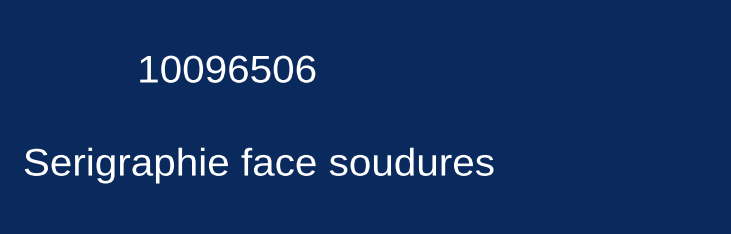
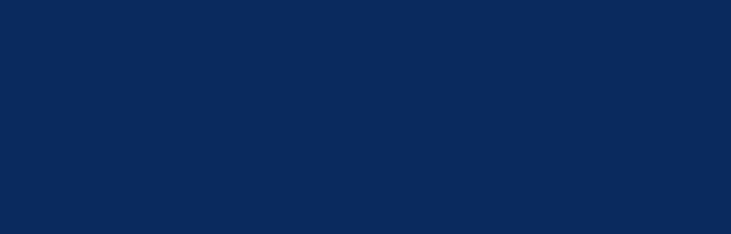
text: 10096506 (227, 69) -> none
text: Serigraphie face soudures (259, 165) -> none

